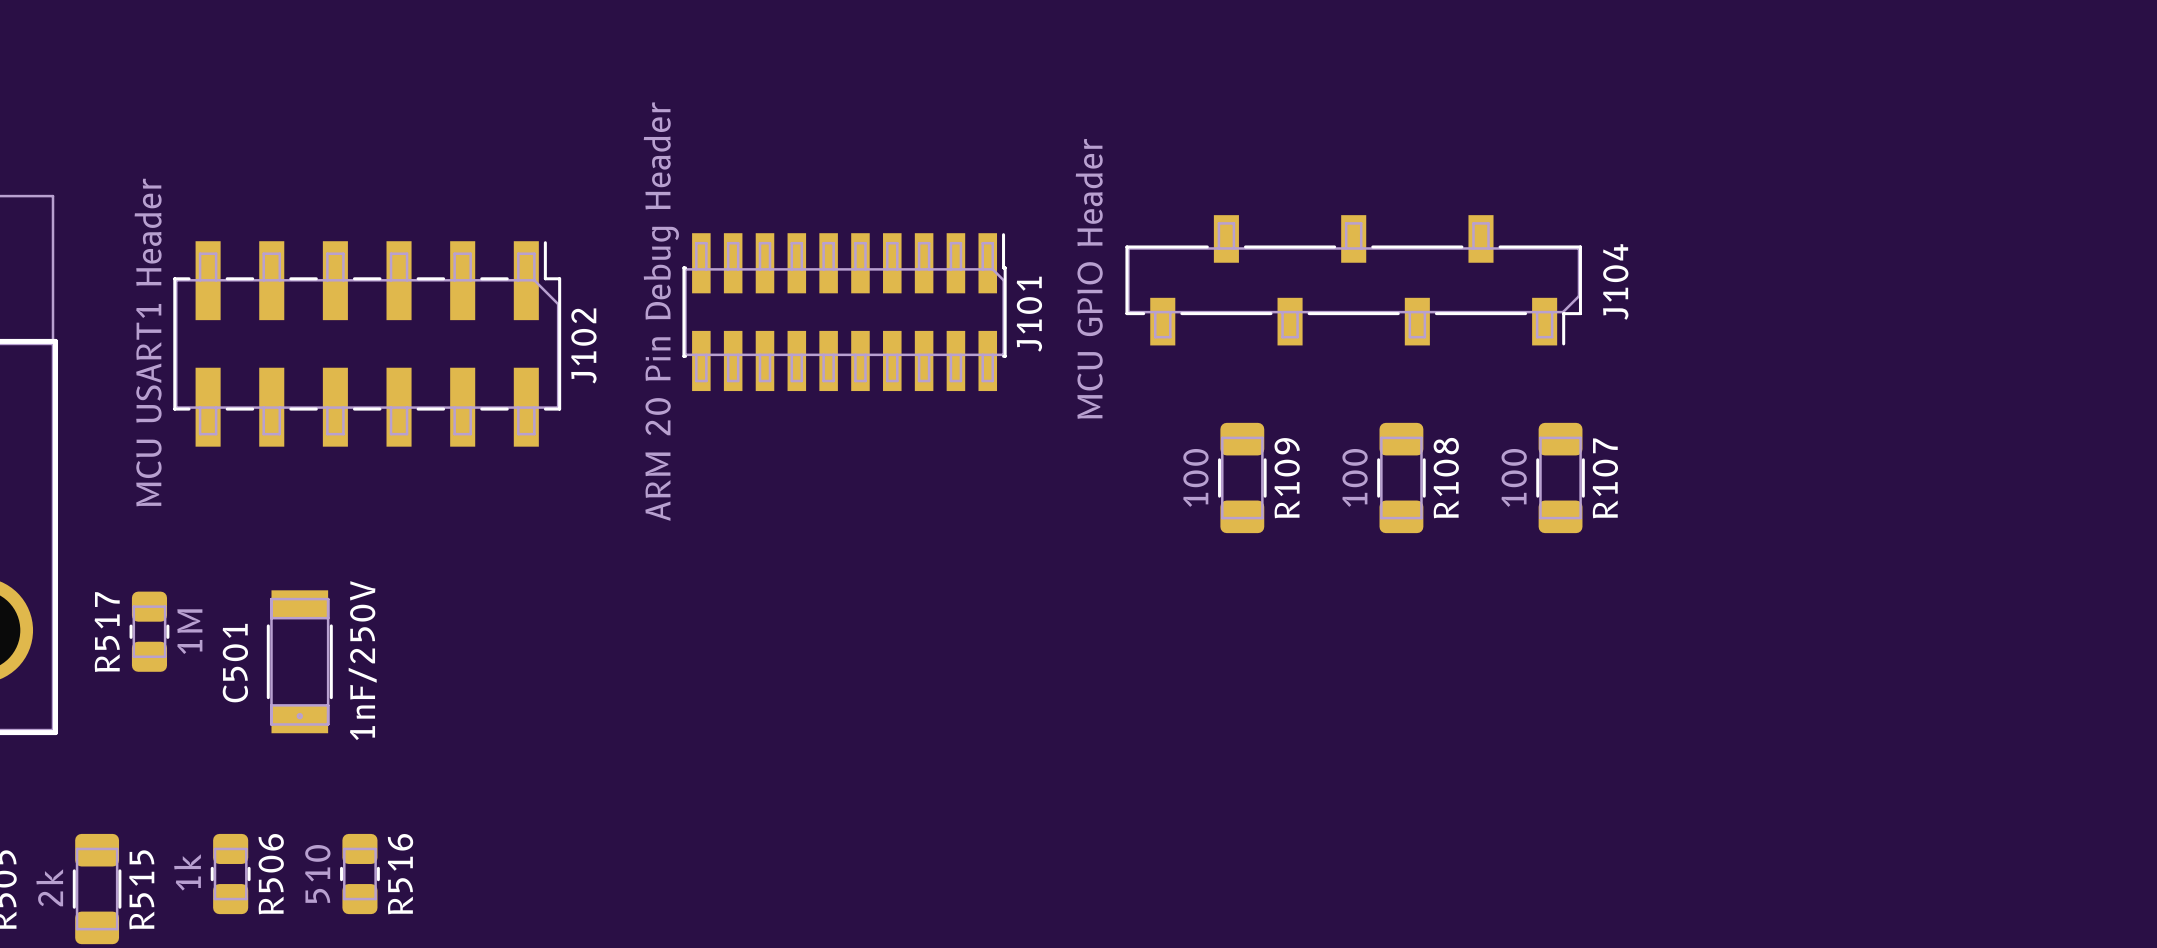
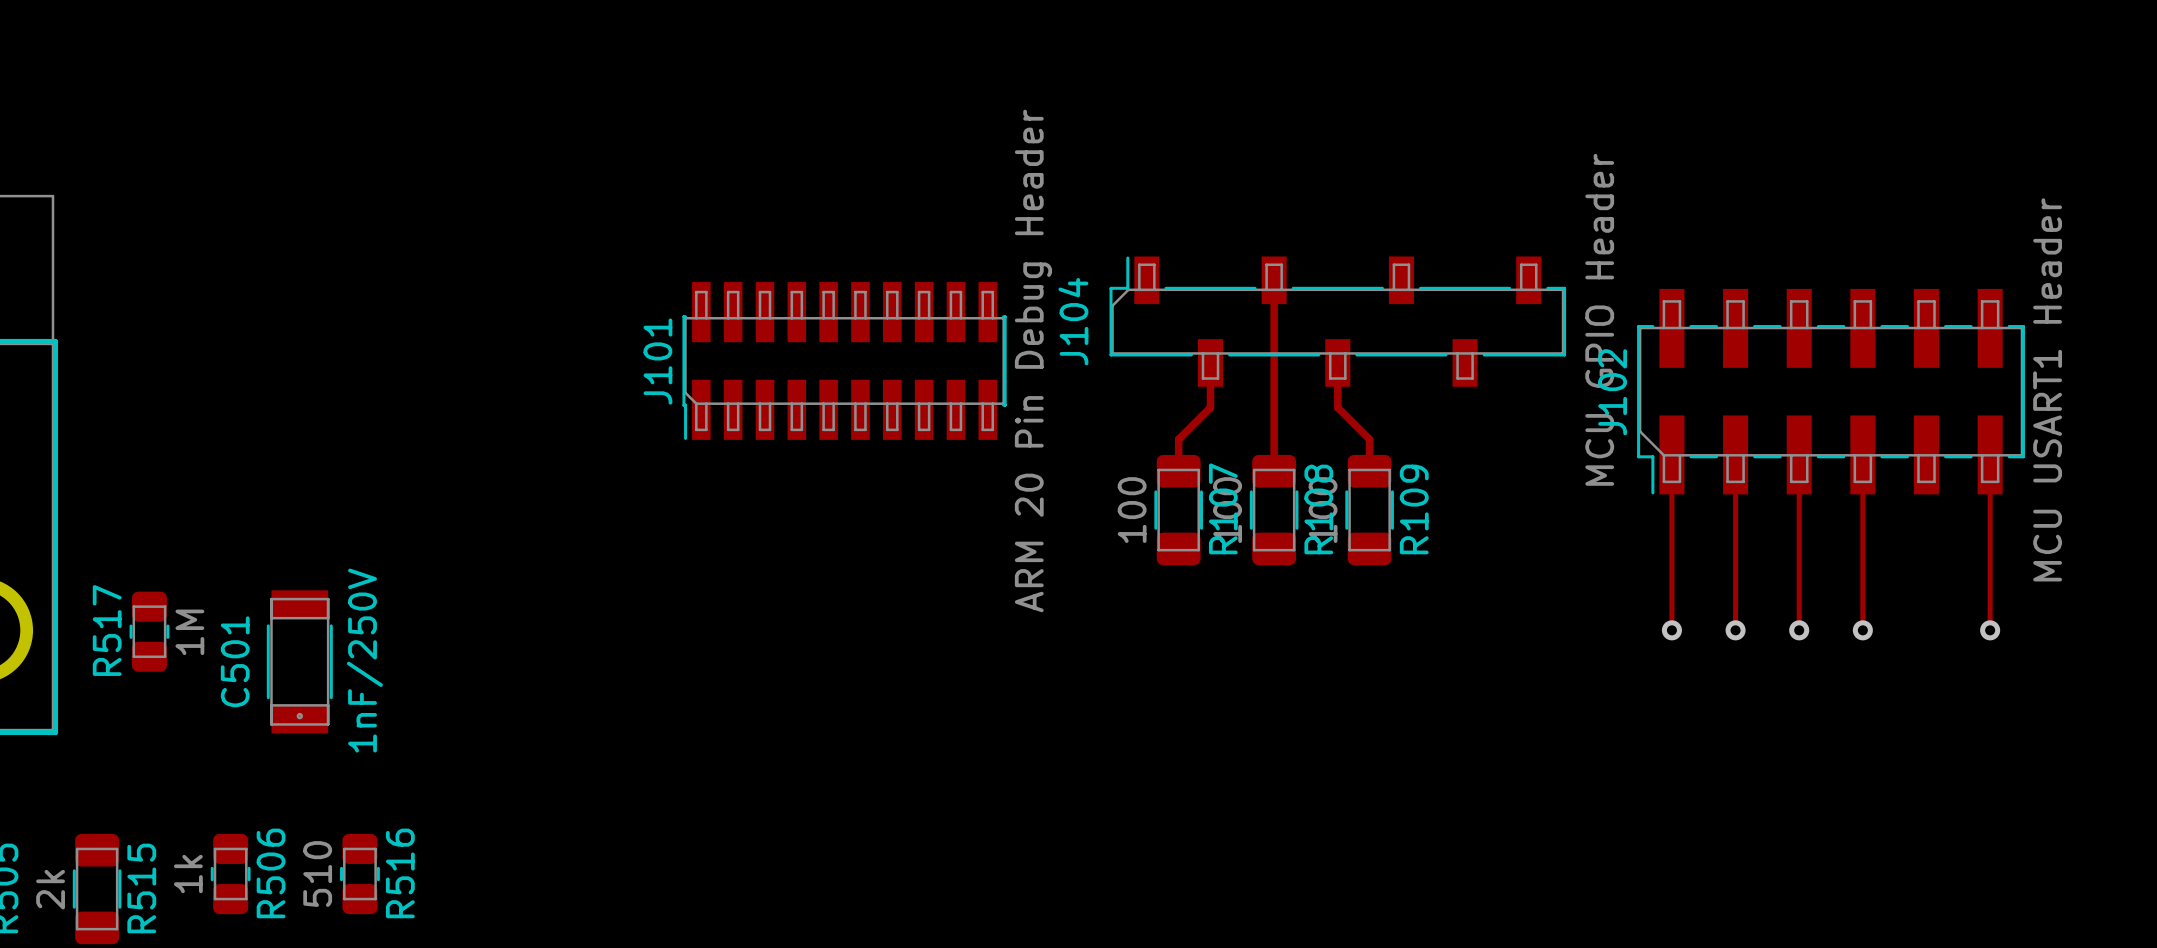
track: none -> (1274, 280) (1274, 471)
J104 rotation: 0° (1353, 280) -> 180° (1337, 321)
J101 rotation: 0° (844, 312) -> 180° (844, 360)
J102 rotation: 0° (367, 343) -> 180° (1831, 391)
J102 position: (367, 343) -> (1831, 391)
track: none -> (1210, 362) (1210, 407) (1178, 439) (1178, 471)
track: none -> (1337, 362) (1337, 407) (1369, 439) (1369, 471)
track: none -> (1671, 454) (1671, 630)
track: none -> (1735, 454) (1735, 630)
track: none -> (1799, 454) (1799, 630)
track: none -> (1862, 454) (1862, 630)
track: none -> (1990, 454) (1990, 630)
R109 position: (1242, 477) -> (1369, 510)
R108 position: (1401, 477) -> (1274, 510)
R107 position: (1560, 477) -> (1178, 510)
via: none -> (1671, 630)
via: none -> (1735, 630)
via: none -> (1799, 630)
via: none -> (1862, 630)
via: none -> (1990, 630)

